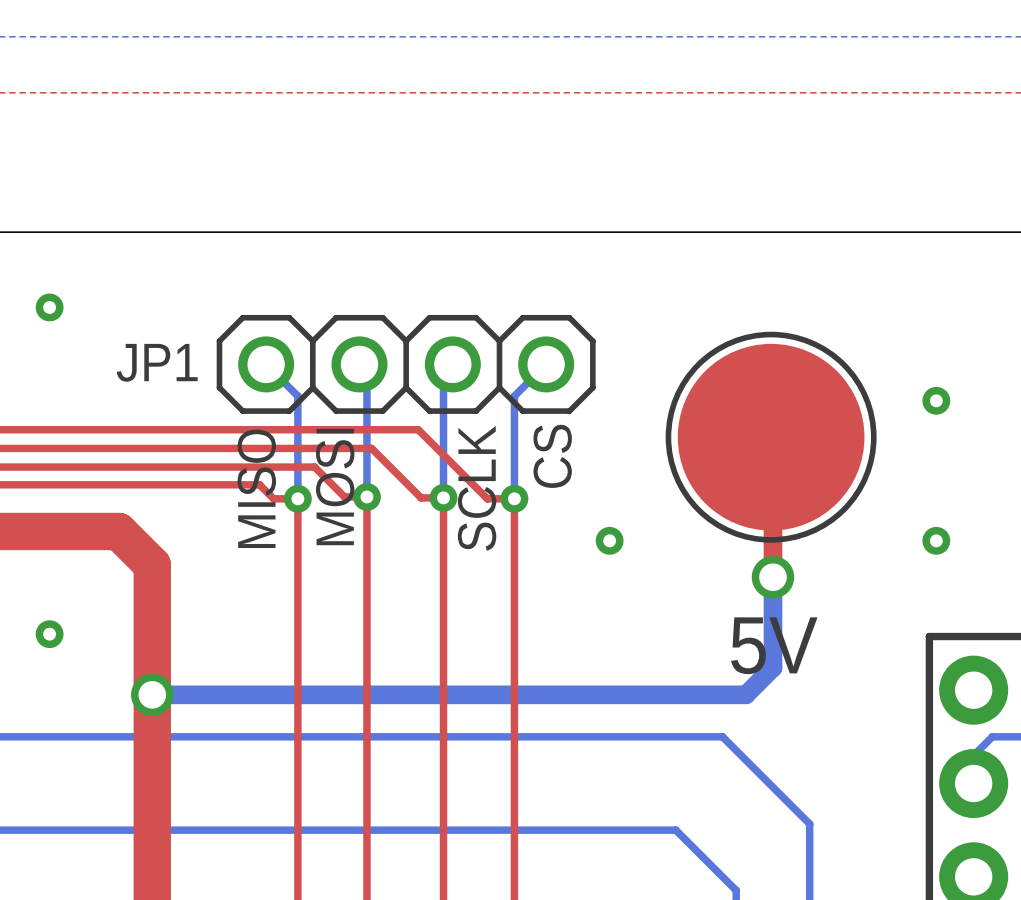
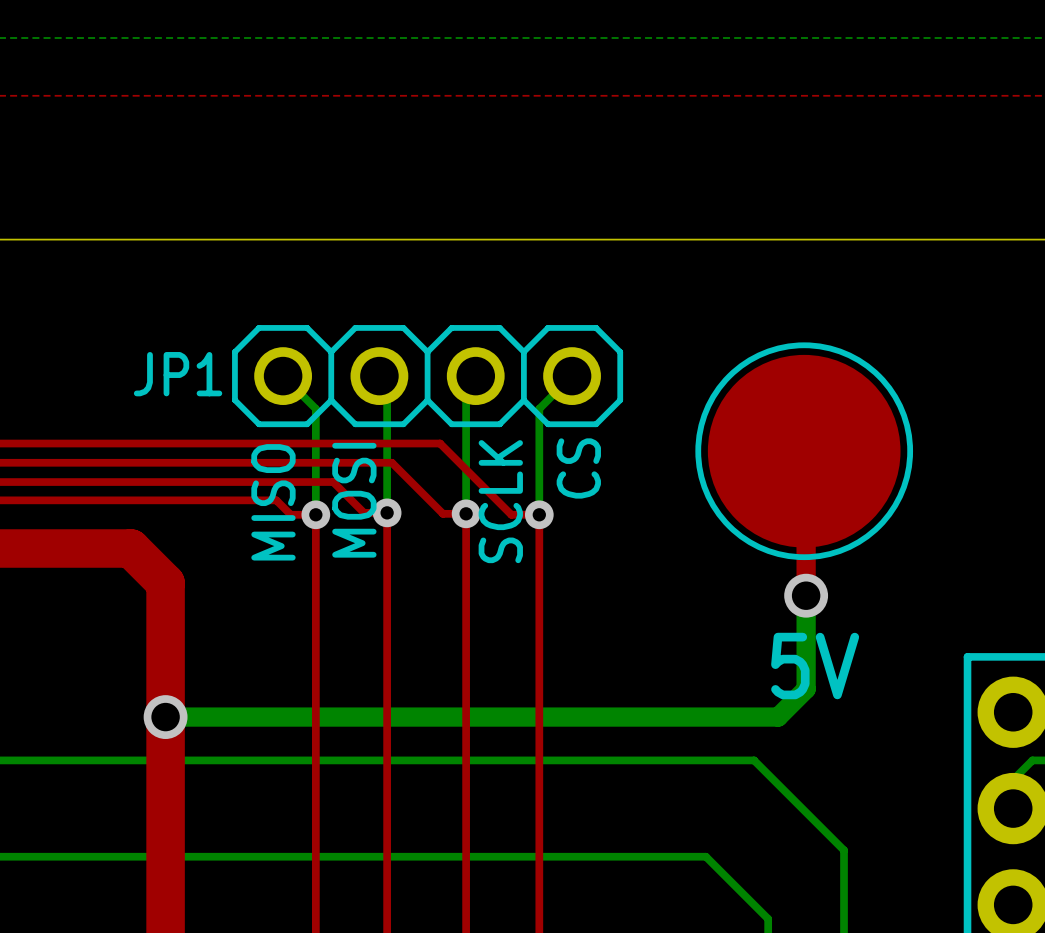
via: (49, 307) -> none
via: (936, 400) -> none
via: (609, 540) -> none
via: (936, 540) -> none
via: (49, 634) -> none

